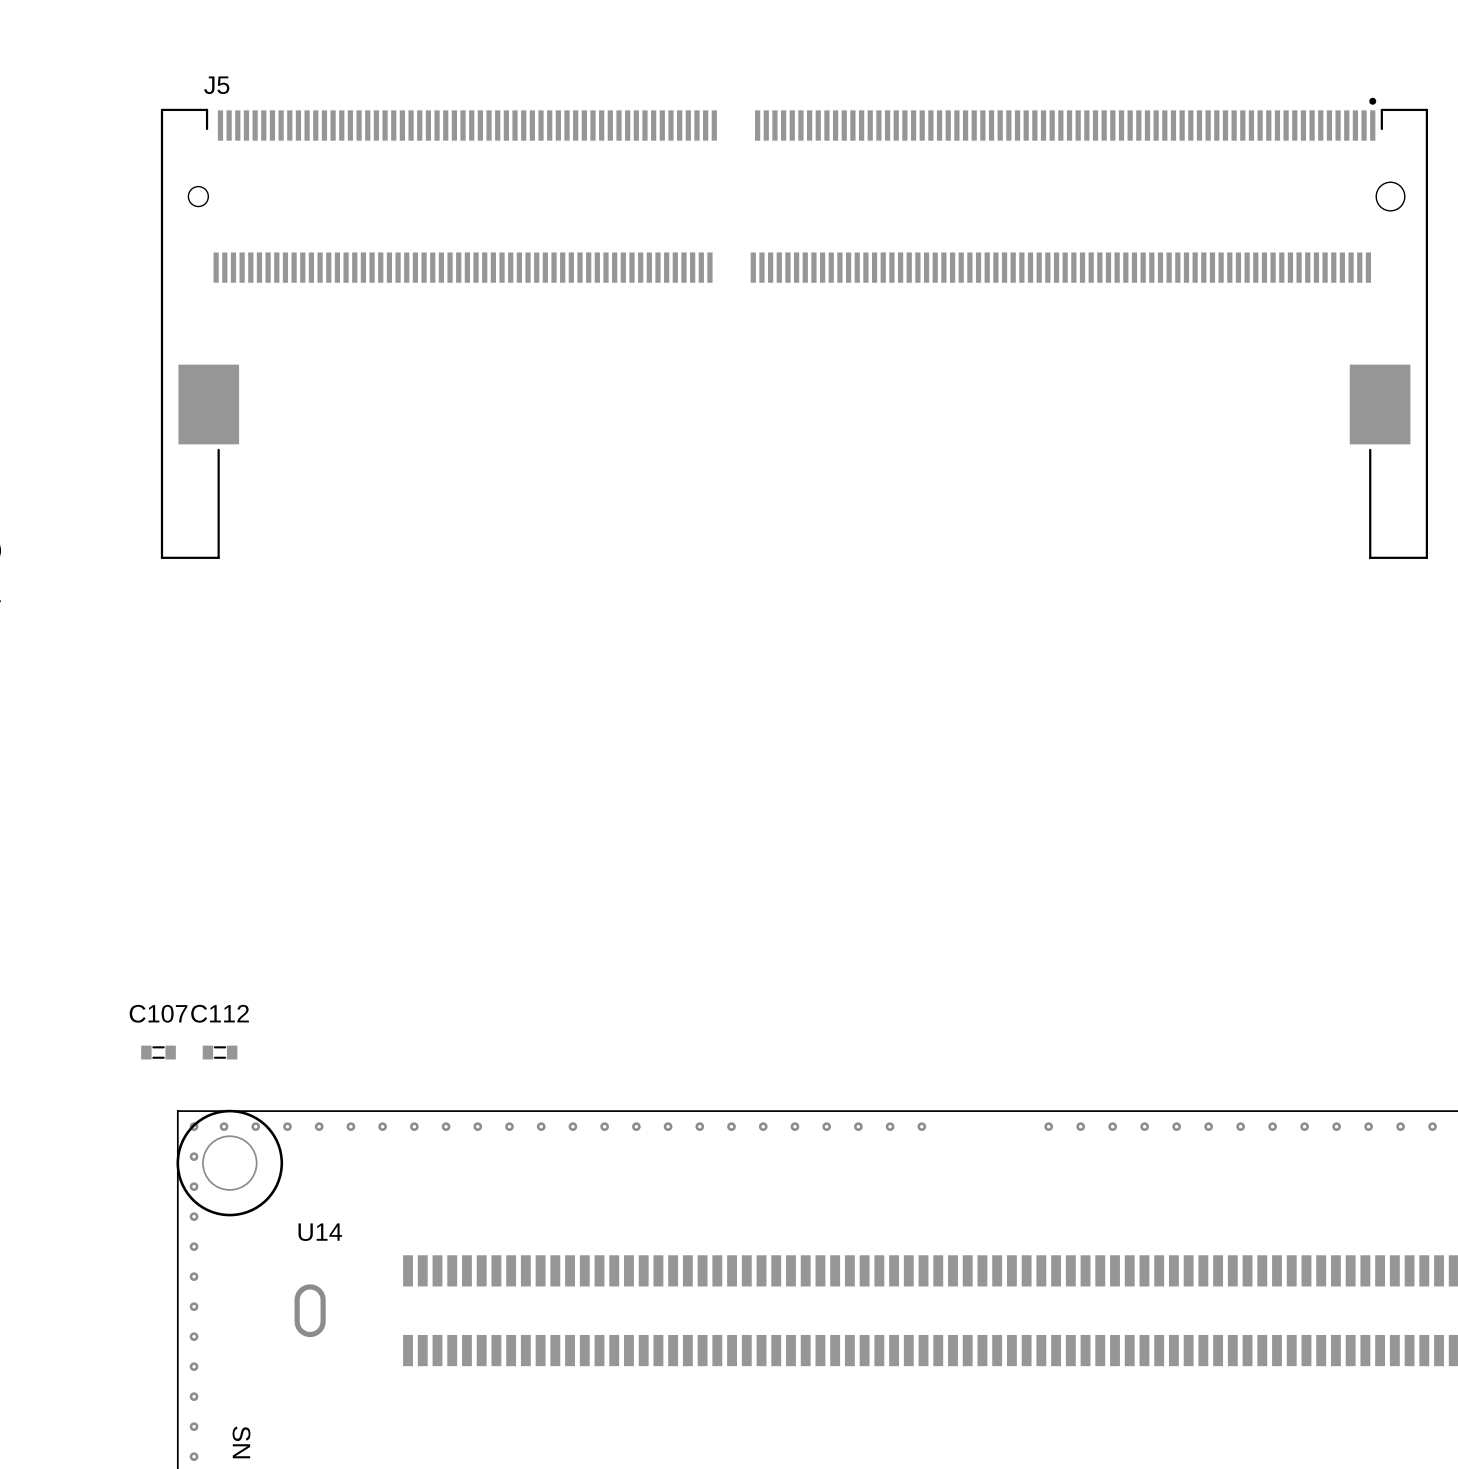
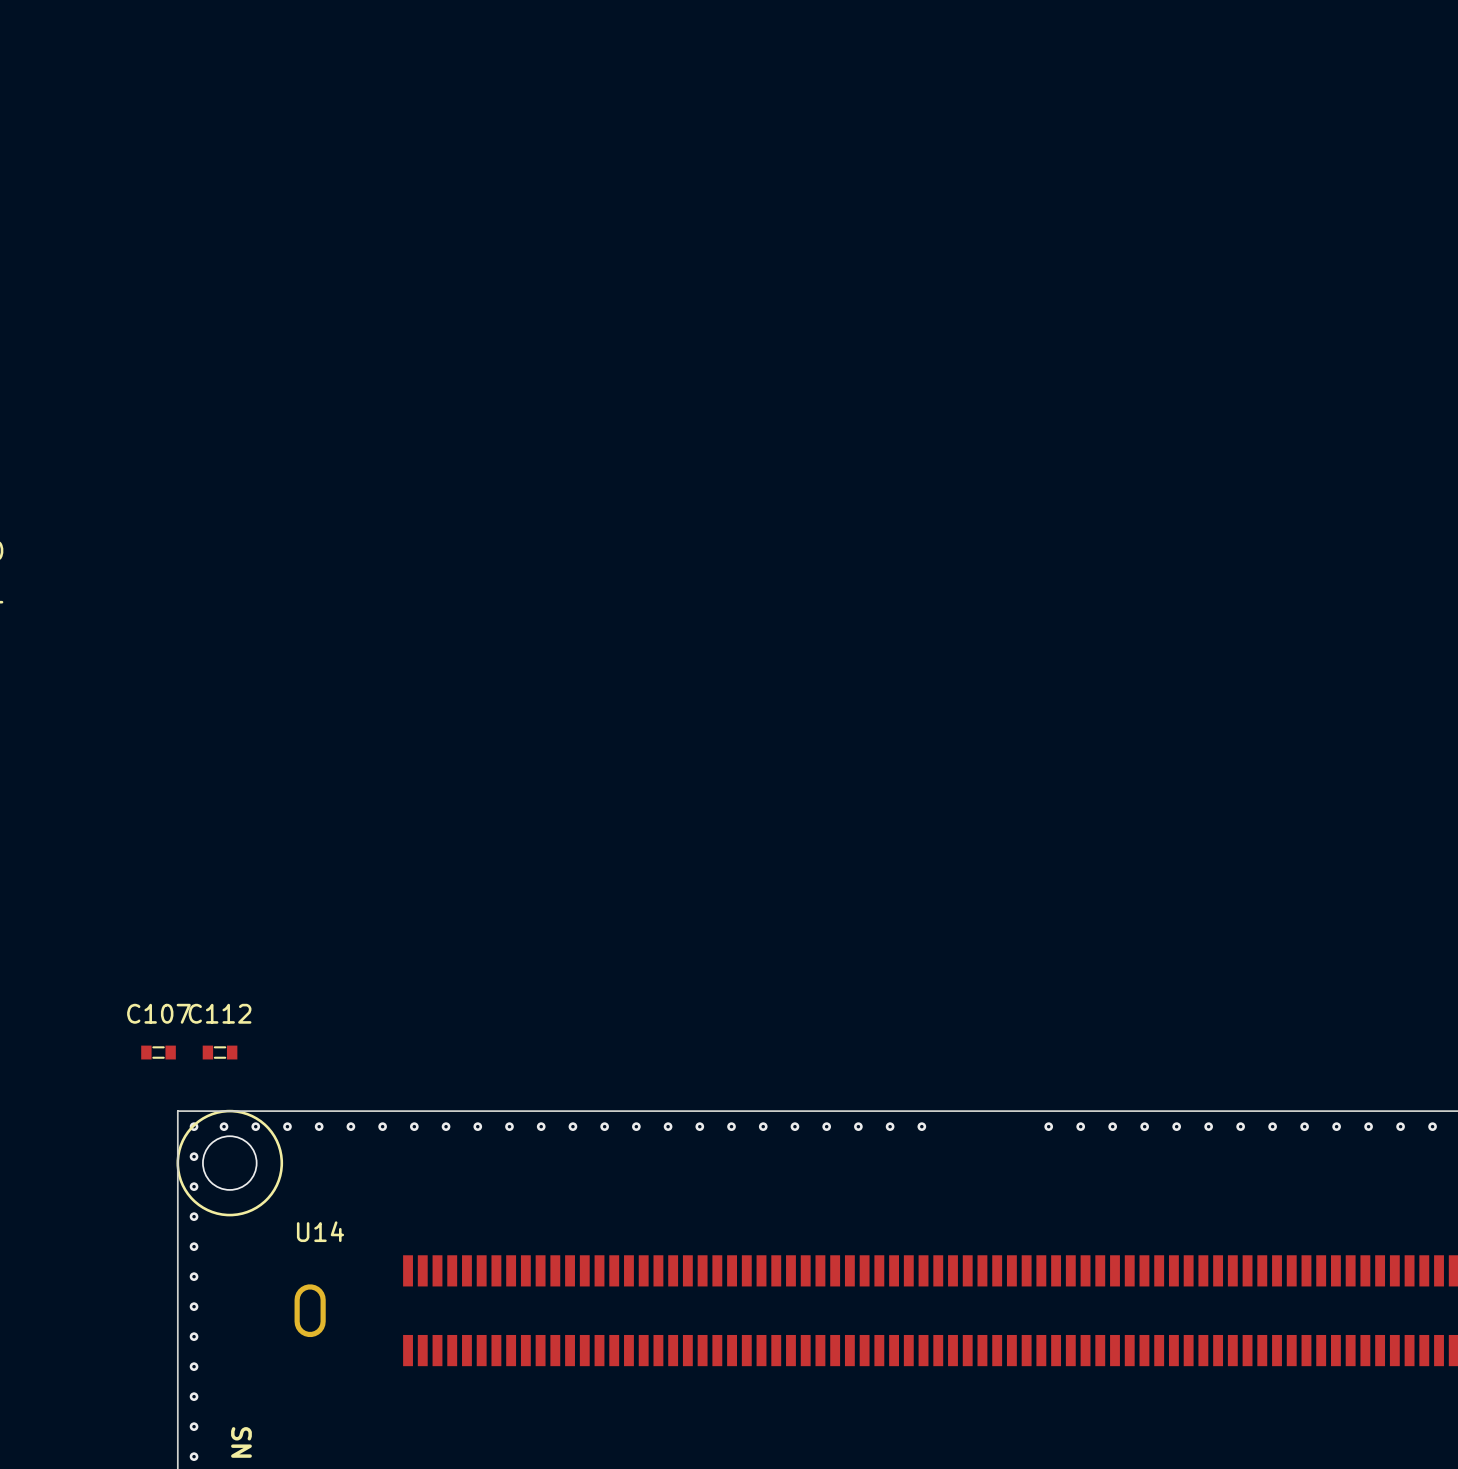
J5: (794, 328) -> none

